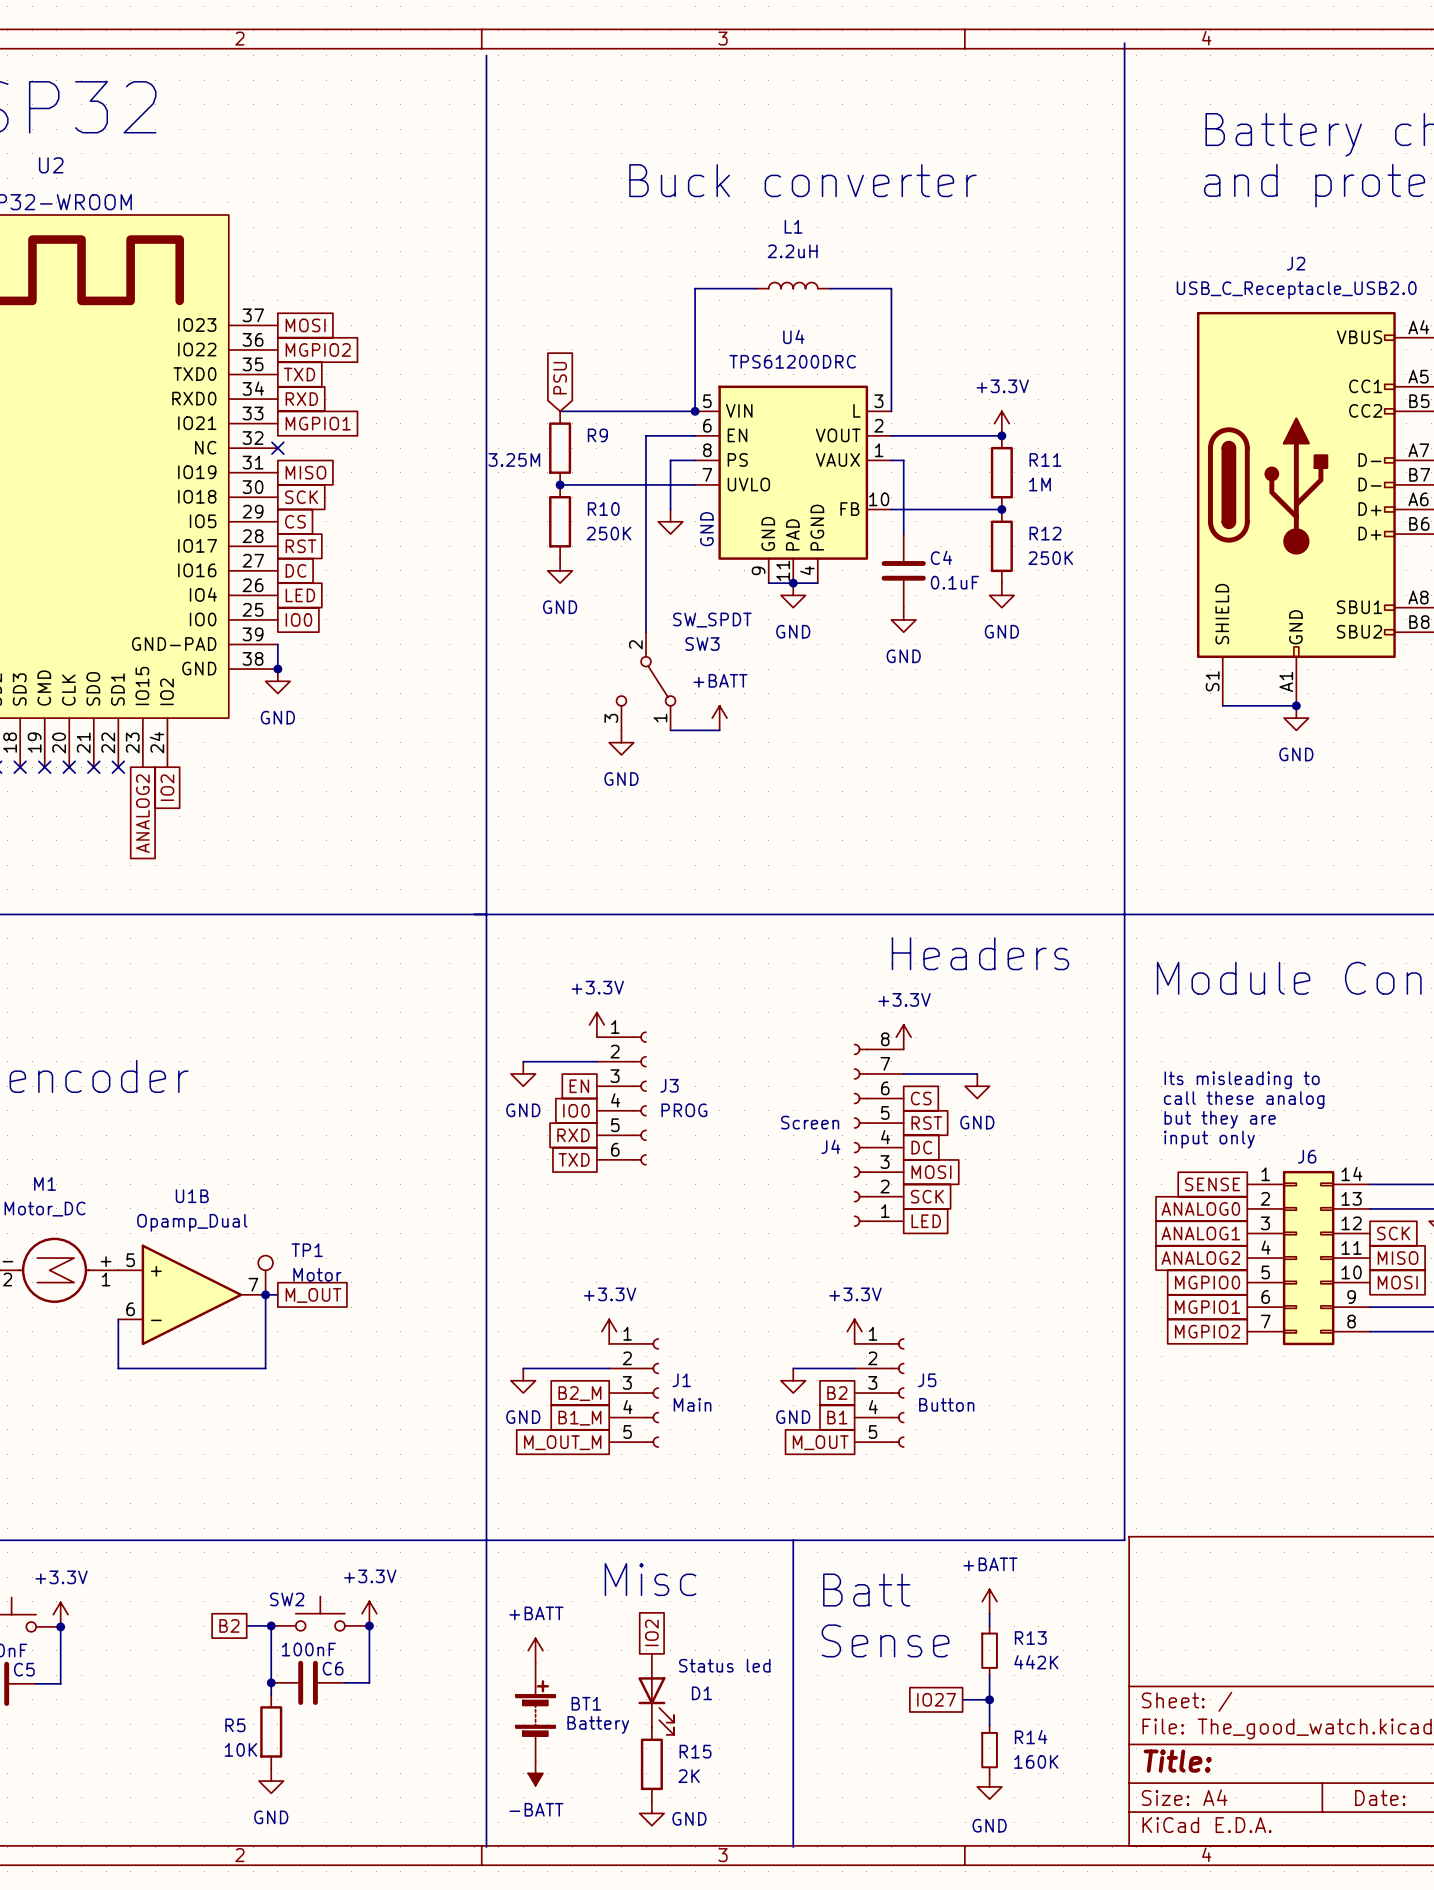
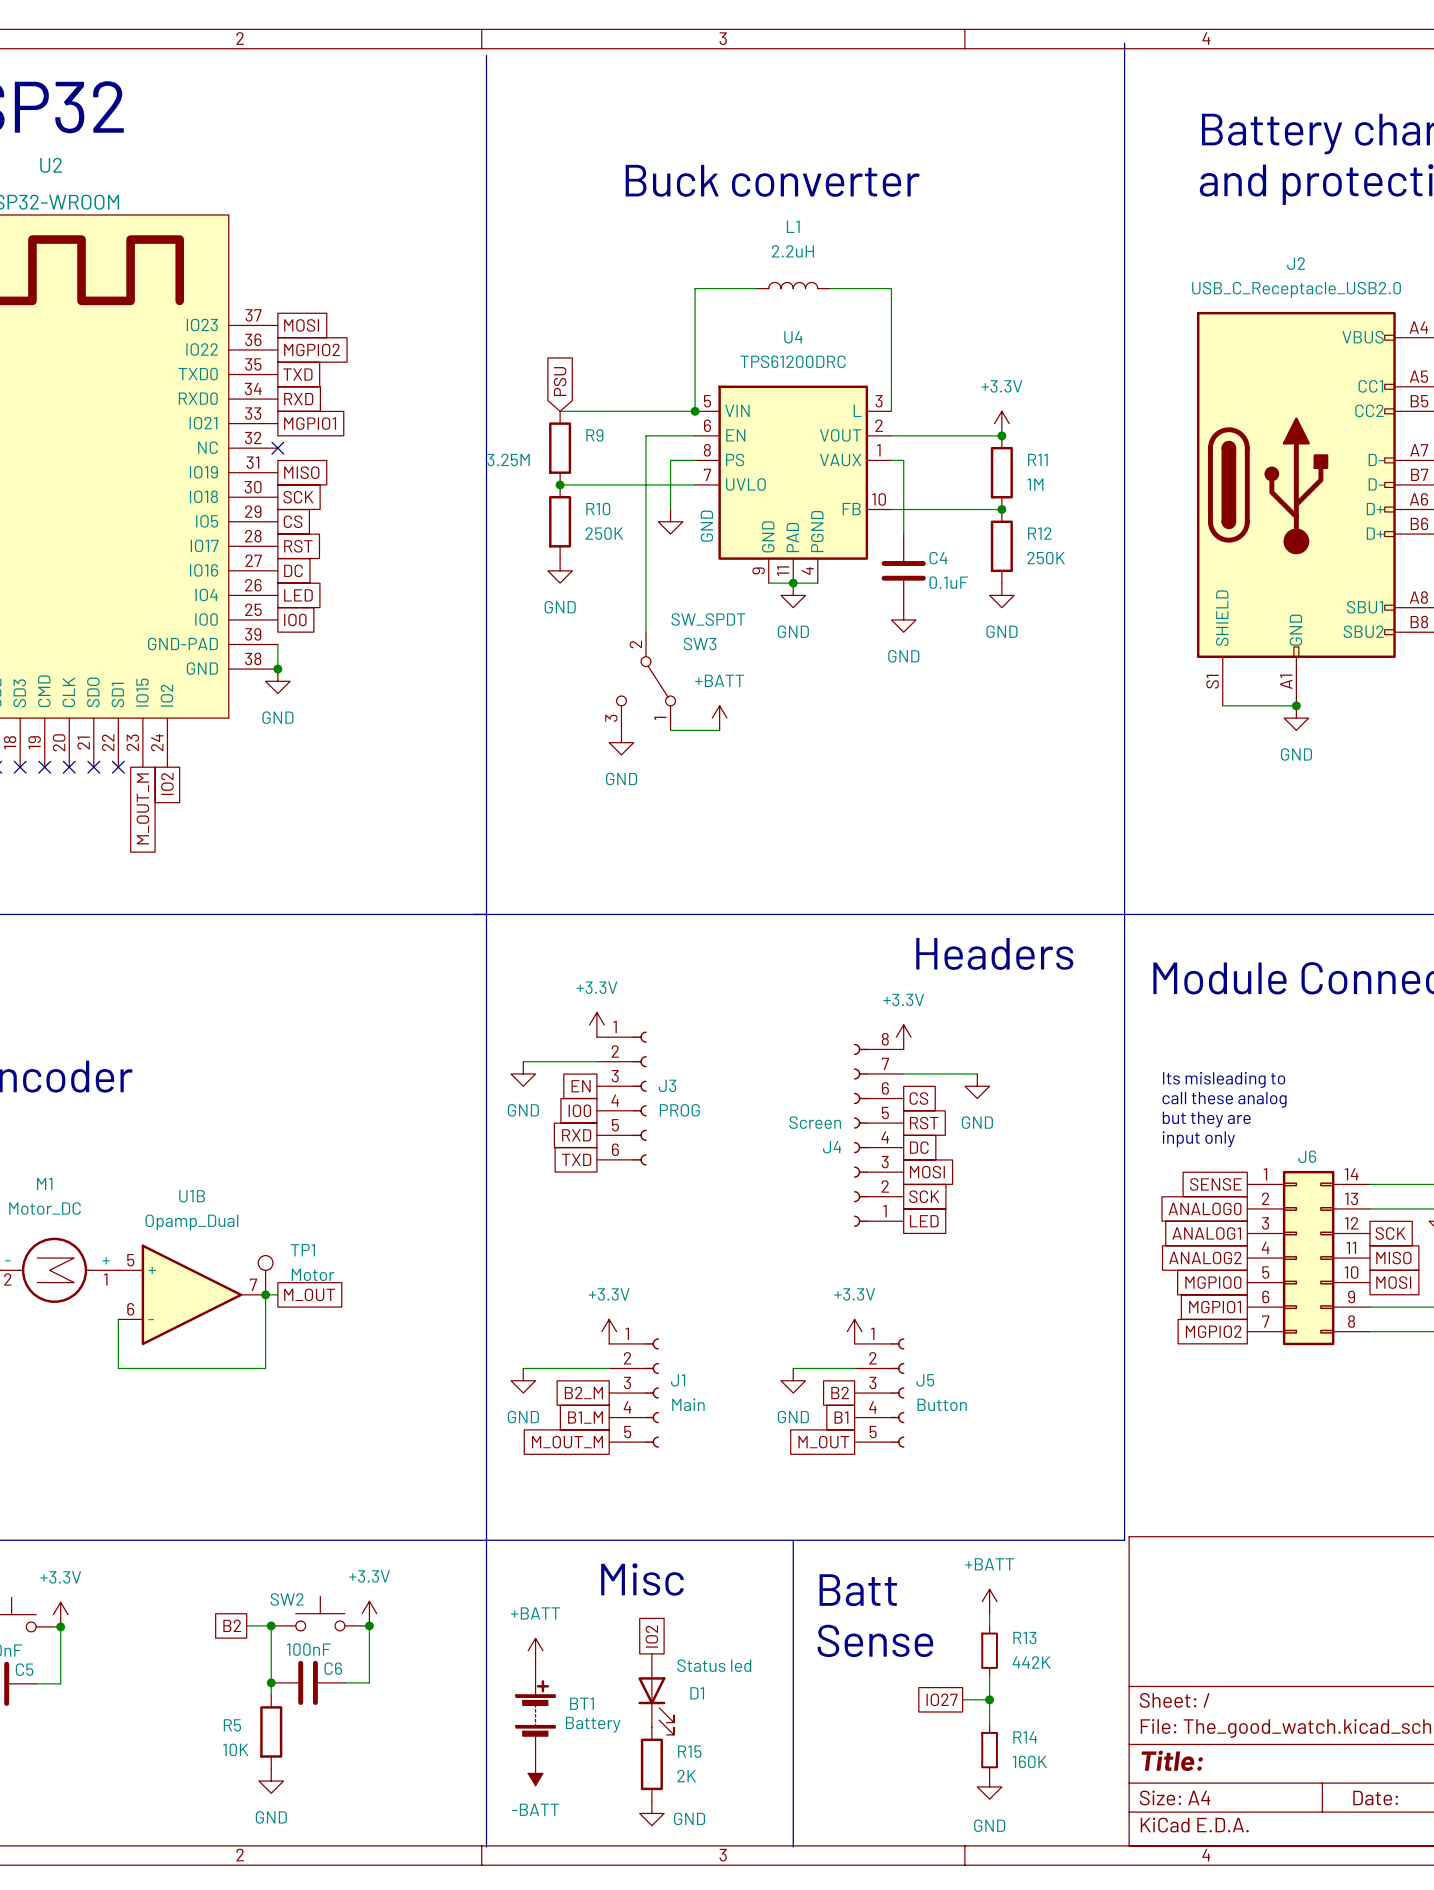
global label: ANALOG2 (142, 813) -> M_OUT_M (142, 808)

